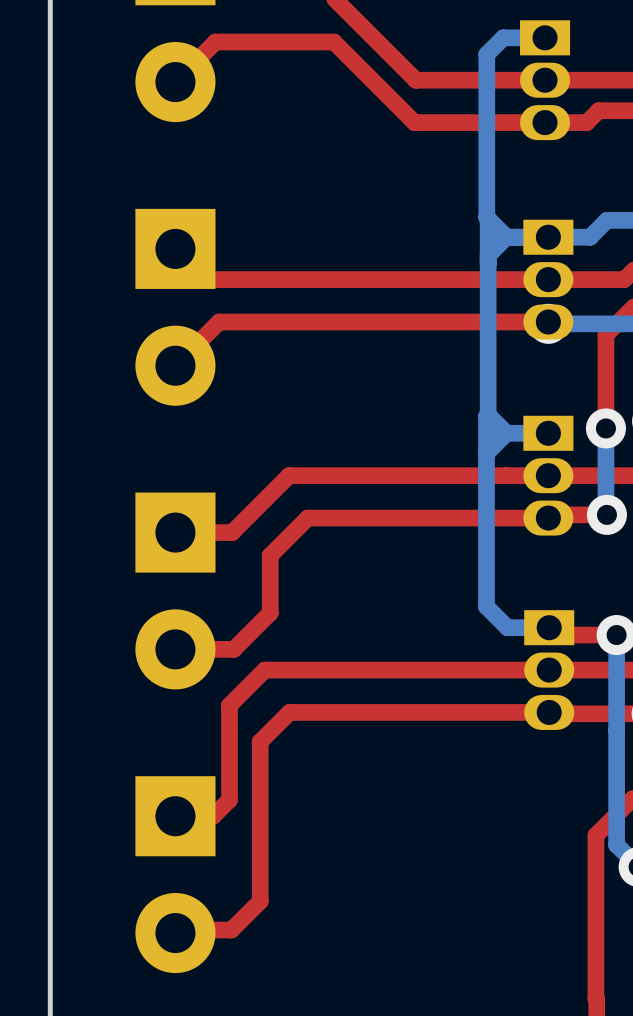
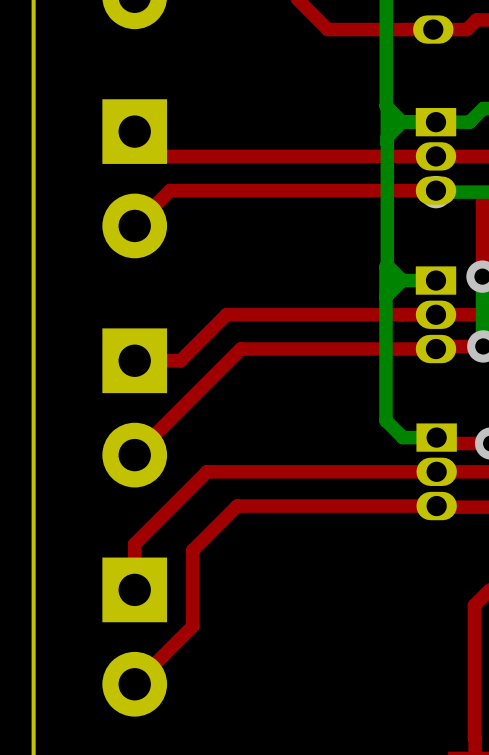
top track: (307, 518) (270, 555) (270, 613) (233, 649) (175, 649) -> (241, 349) (134, 455)
top track: (229, 705) (229, 799) (213, 816) (175, 816) -> (178, 500) (134, 544) (134, 589)
top track: (302, 712) (289, 712) (260, 741) (260, 901) (231, 930) (178, 930) -> (237, 506) (192, 550) (192, 626) (137, 681)

